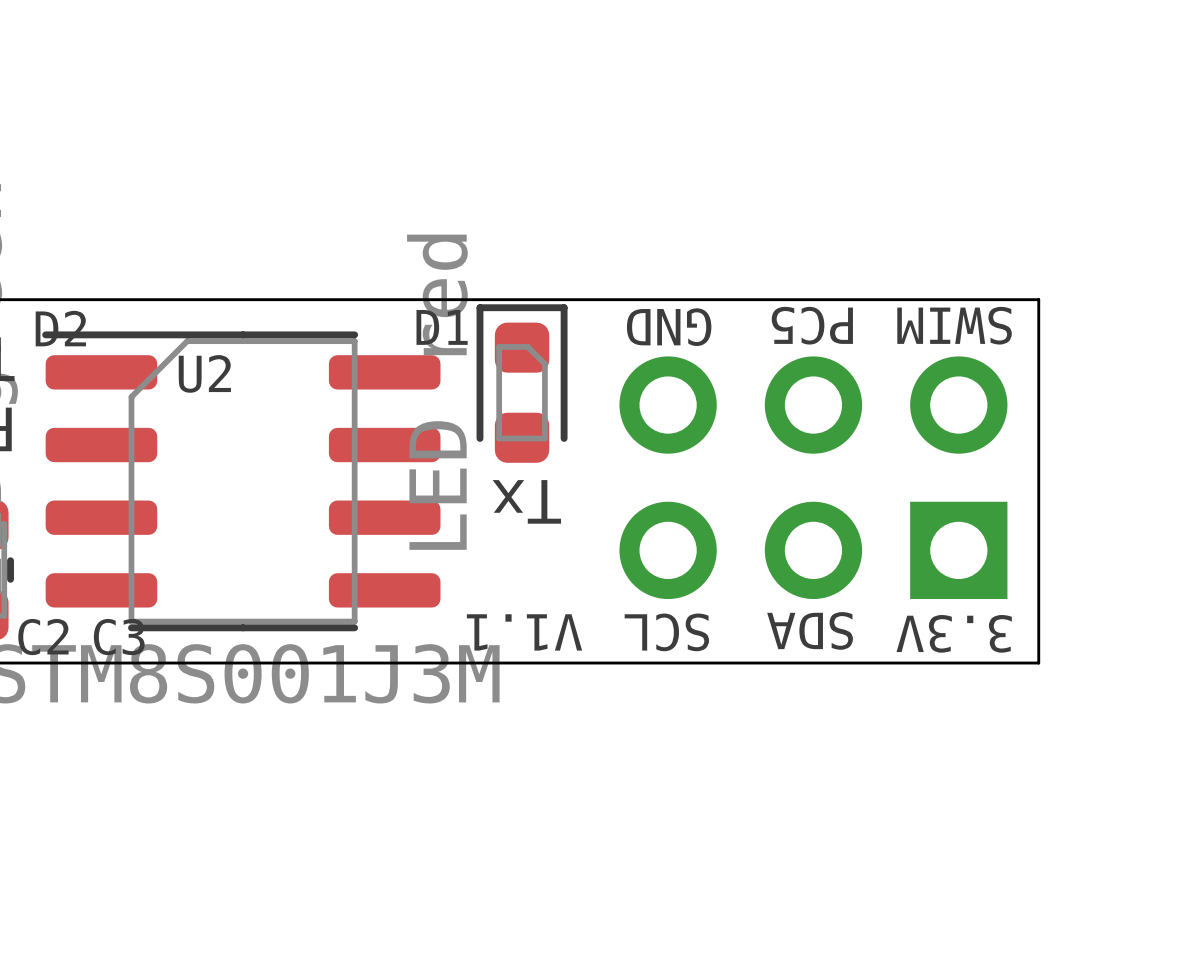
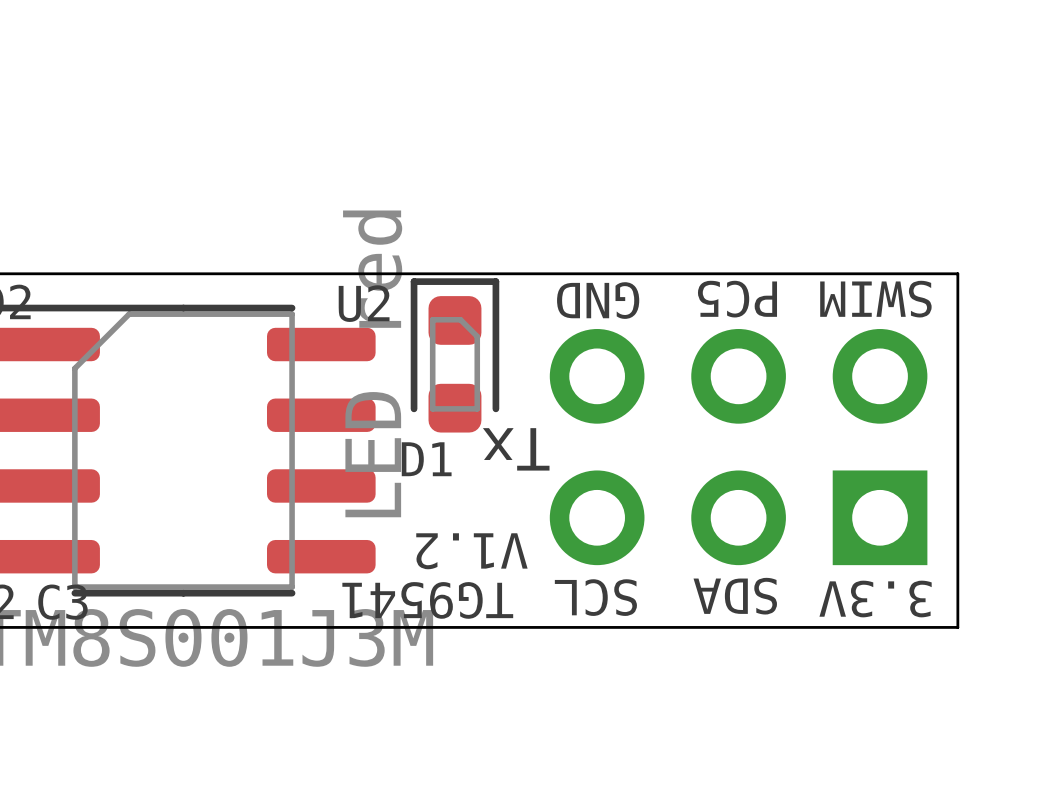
D1 name position: D1 (442, 327) -> D1 (426, 459)
U2 name position: U2 (204, 373) -> U2 (364, 303)
text position: Tx (526, 501) -> Tx (516, 449)
text: V1.1 (524, 632) -> V1.2 (471, 551)
text: none -> TG9541 (427, 600)

